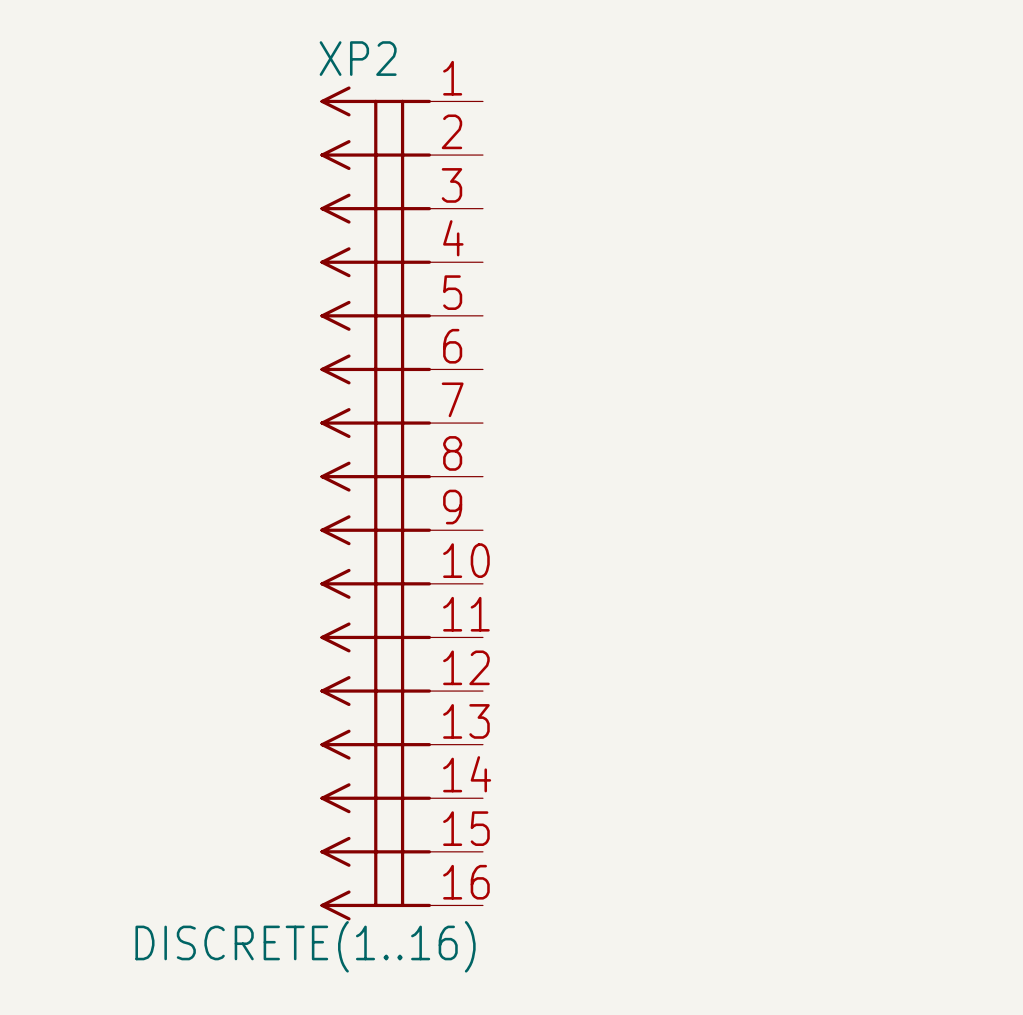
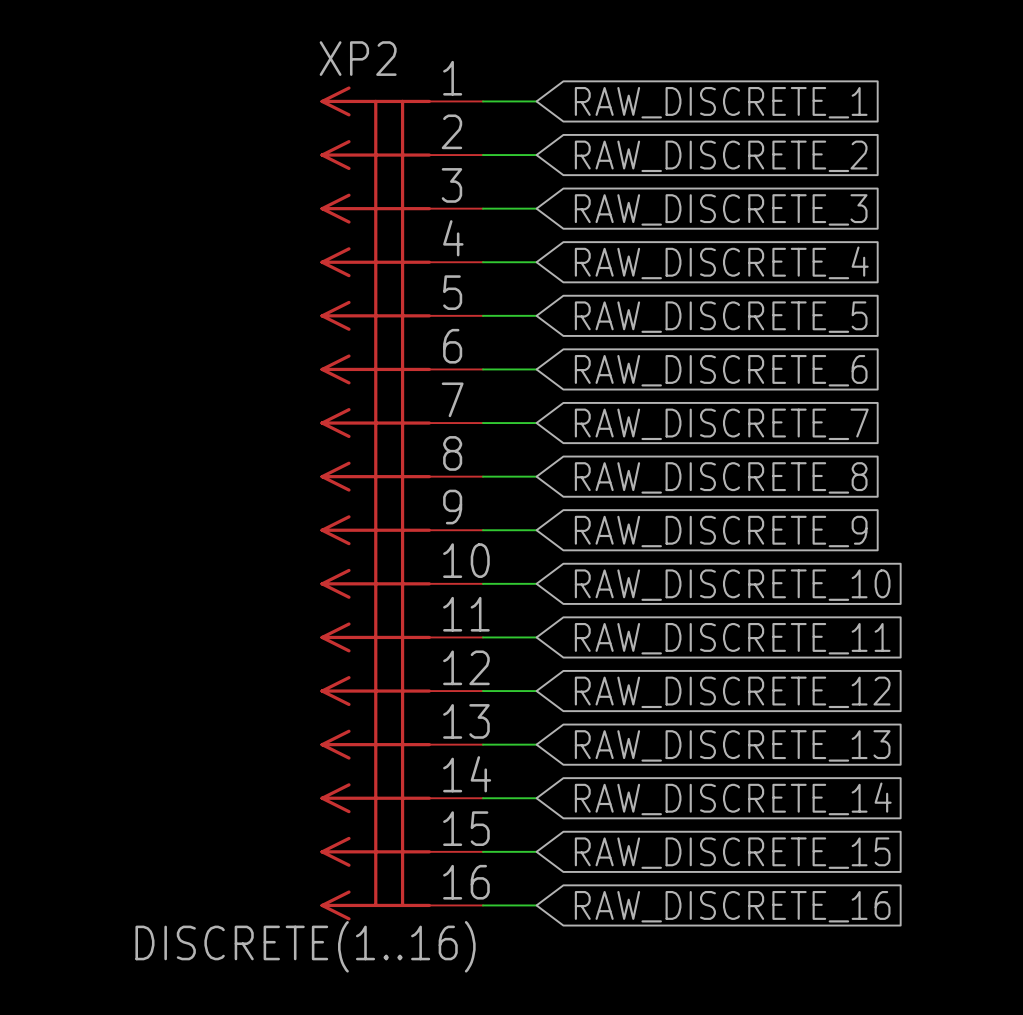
wire: none -> (482, 101) (536, 101)
global label: none -> RAW_DISCRETE_1 (721, 102)
wire: none -> (482, 155) (536, 155)
global label: none -> RAW_DISCRETE_2 (721, 156)
wire: none -> (482, 208) (536, 208)
global label: none -> RAW_DISCRETE_3 (721, 209)
wire: none -> (482, 262) (536, 262)
global label: none -> RAW_DISCRETE_4 (721, 262)
wire: none -> (482, 315) (536, 315)
global label: none -> RAW_DISCRETE_5 (721, 317)
wire: none -> (482, 369) (536, 369)
global label: none -> RAW_DISCRETE_6 (721, 370)
wire: none -> (482, 423) (536, 423)
global label: none -> RAW_DISCRETE_7 (721, 424)
wire: none -> (482, 476) (536, 476)
global label: none -> RAW_DISCRETE_8 (721, 477)
wire: none -> (482, 530) (536, 530)
global label: none -> RAW_DISCRETE_9 (721, 531)
wire: none -> (482, 583) (536, 583)
global label: none -> RAW_DISCRETE_10 (732, 585)
wire: none -> (482, 637) (536, 637)
global label: none -> RAW_DISCRETE_11 (732, 638)
wire: none -> (482, 691) (536, 691)
global label: none -> RAW_DISCRETE_12 (732, 692)
wire: none -> (482, 744) (536, 744)
global label: none -> RAW_DISCRETE_13 (732, 745)
wire: none -> (482, 798) (536, 798)
global label: none -> RAW_DISCRETE_14 (733, 798)
wire: none -> (482, 851) (536, 851)
global label: none -> RAW_DISCRETE_15 (732, 853)
wire: none -> (482, 905) (536, 905)
global label: none -> RAW_DISCRETE_16 (732, 906)

